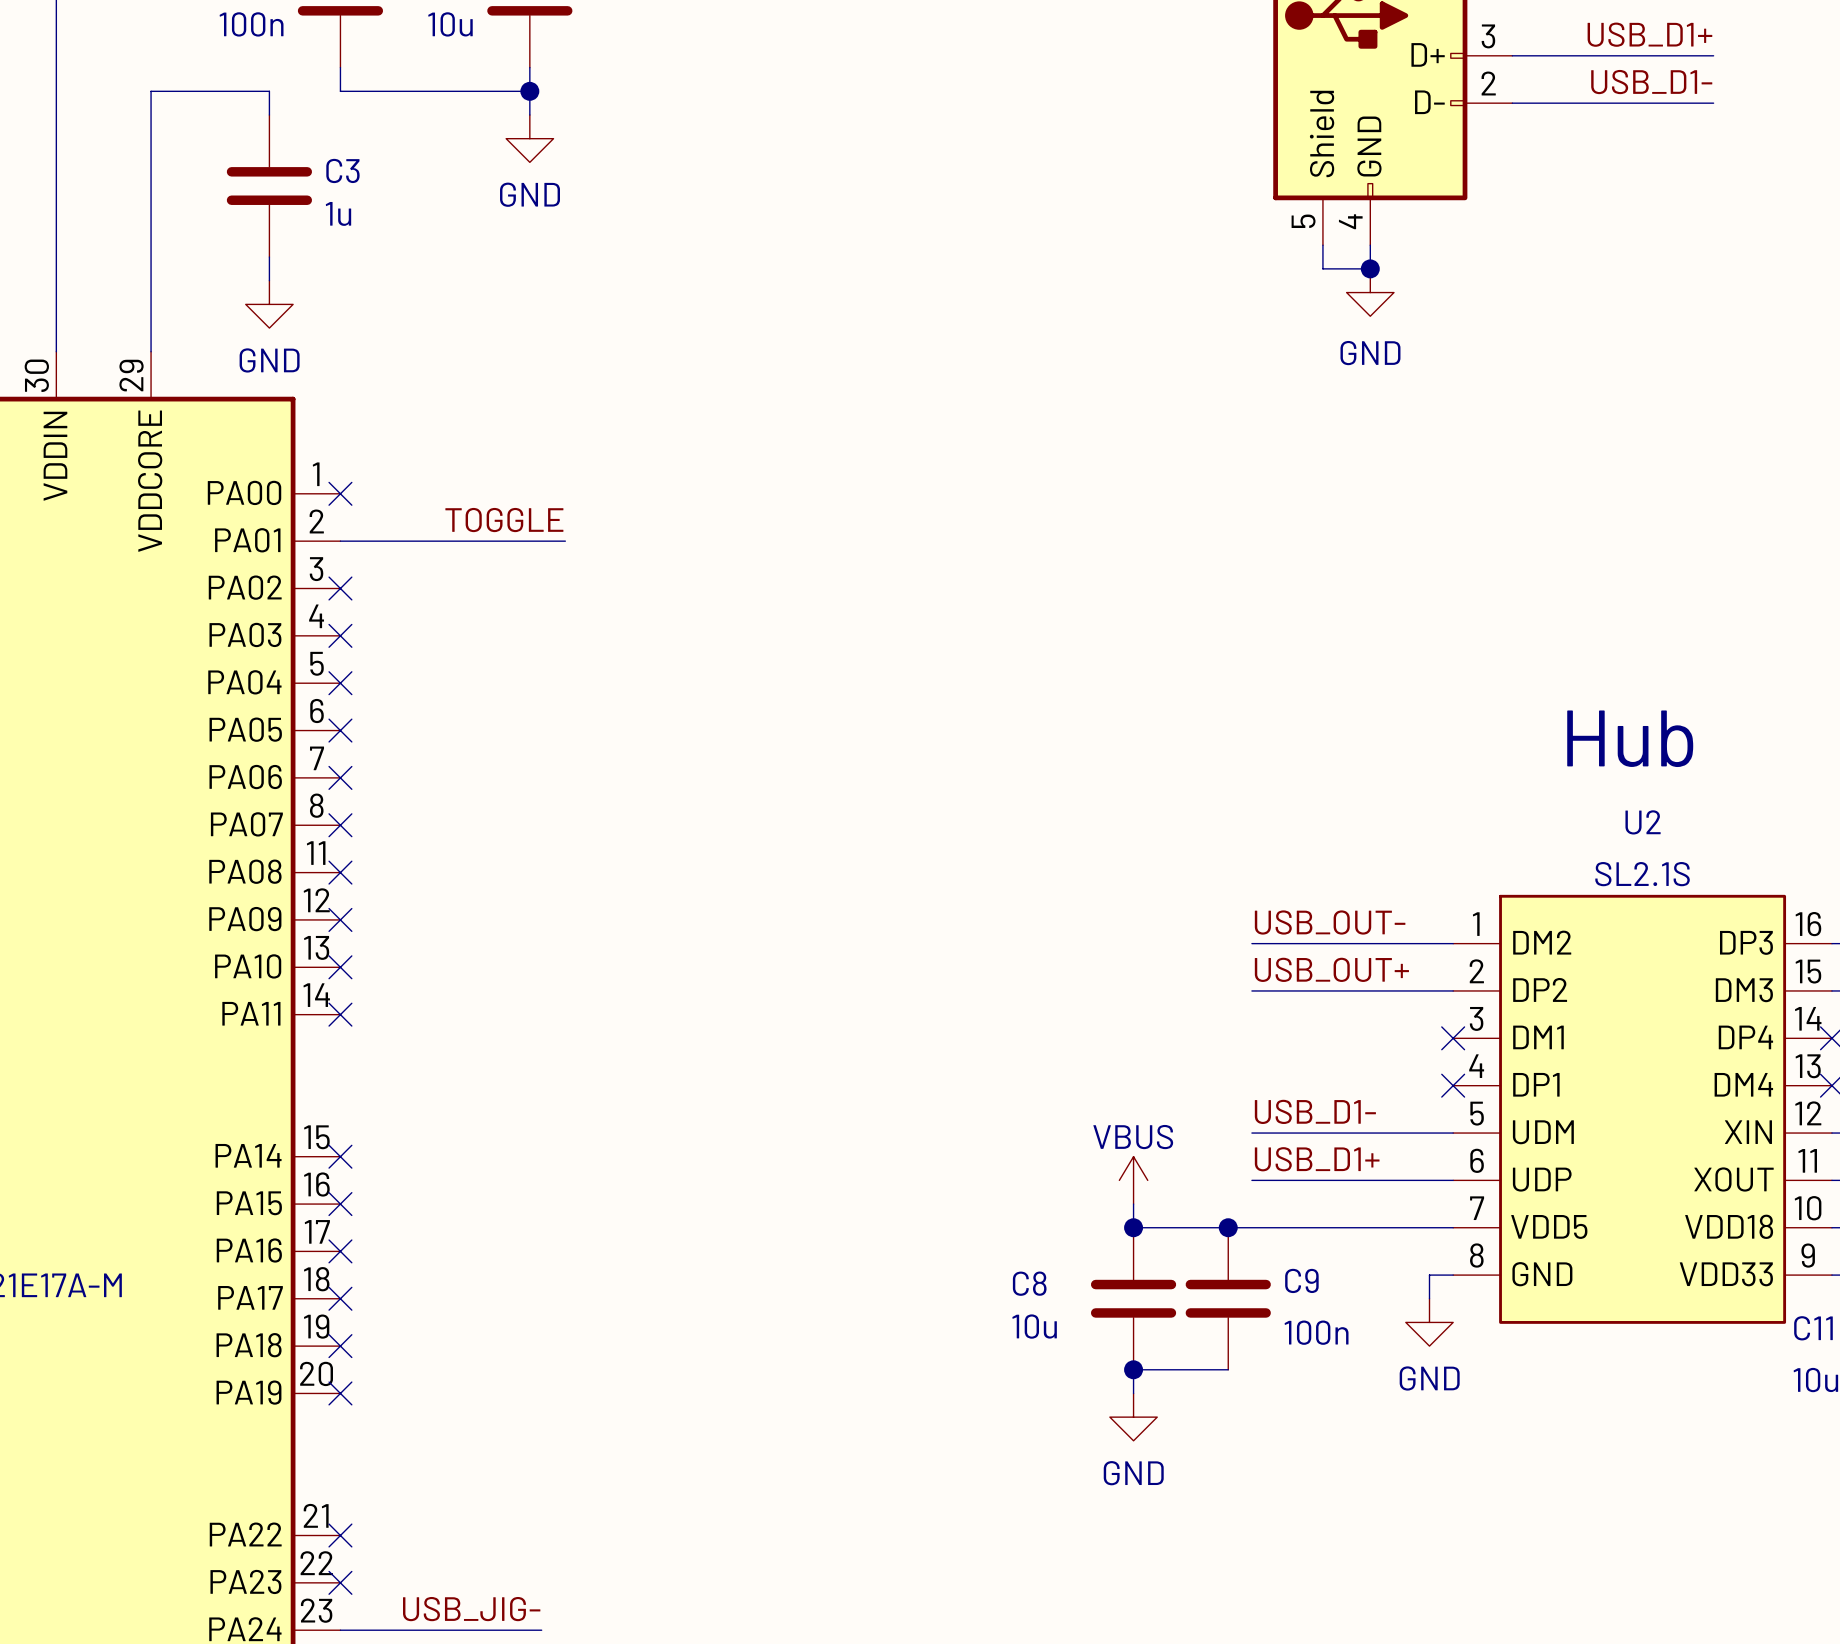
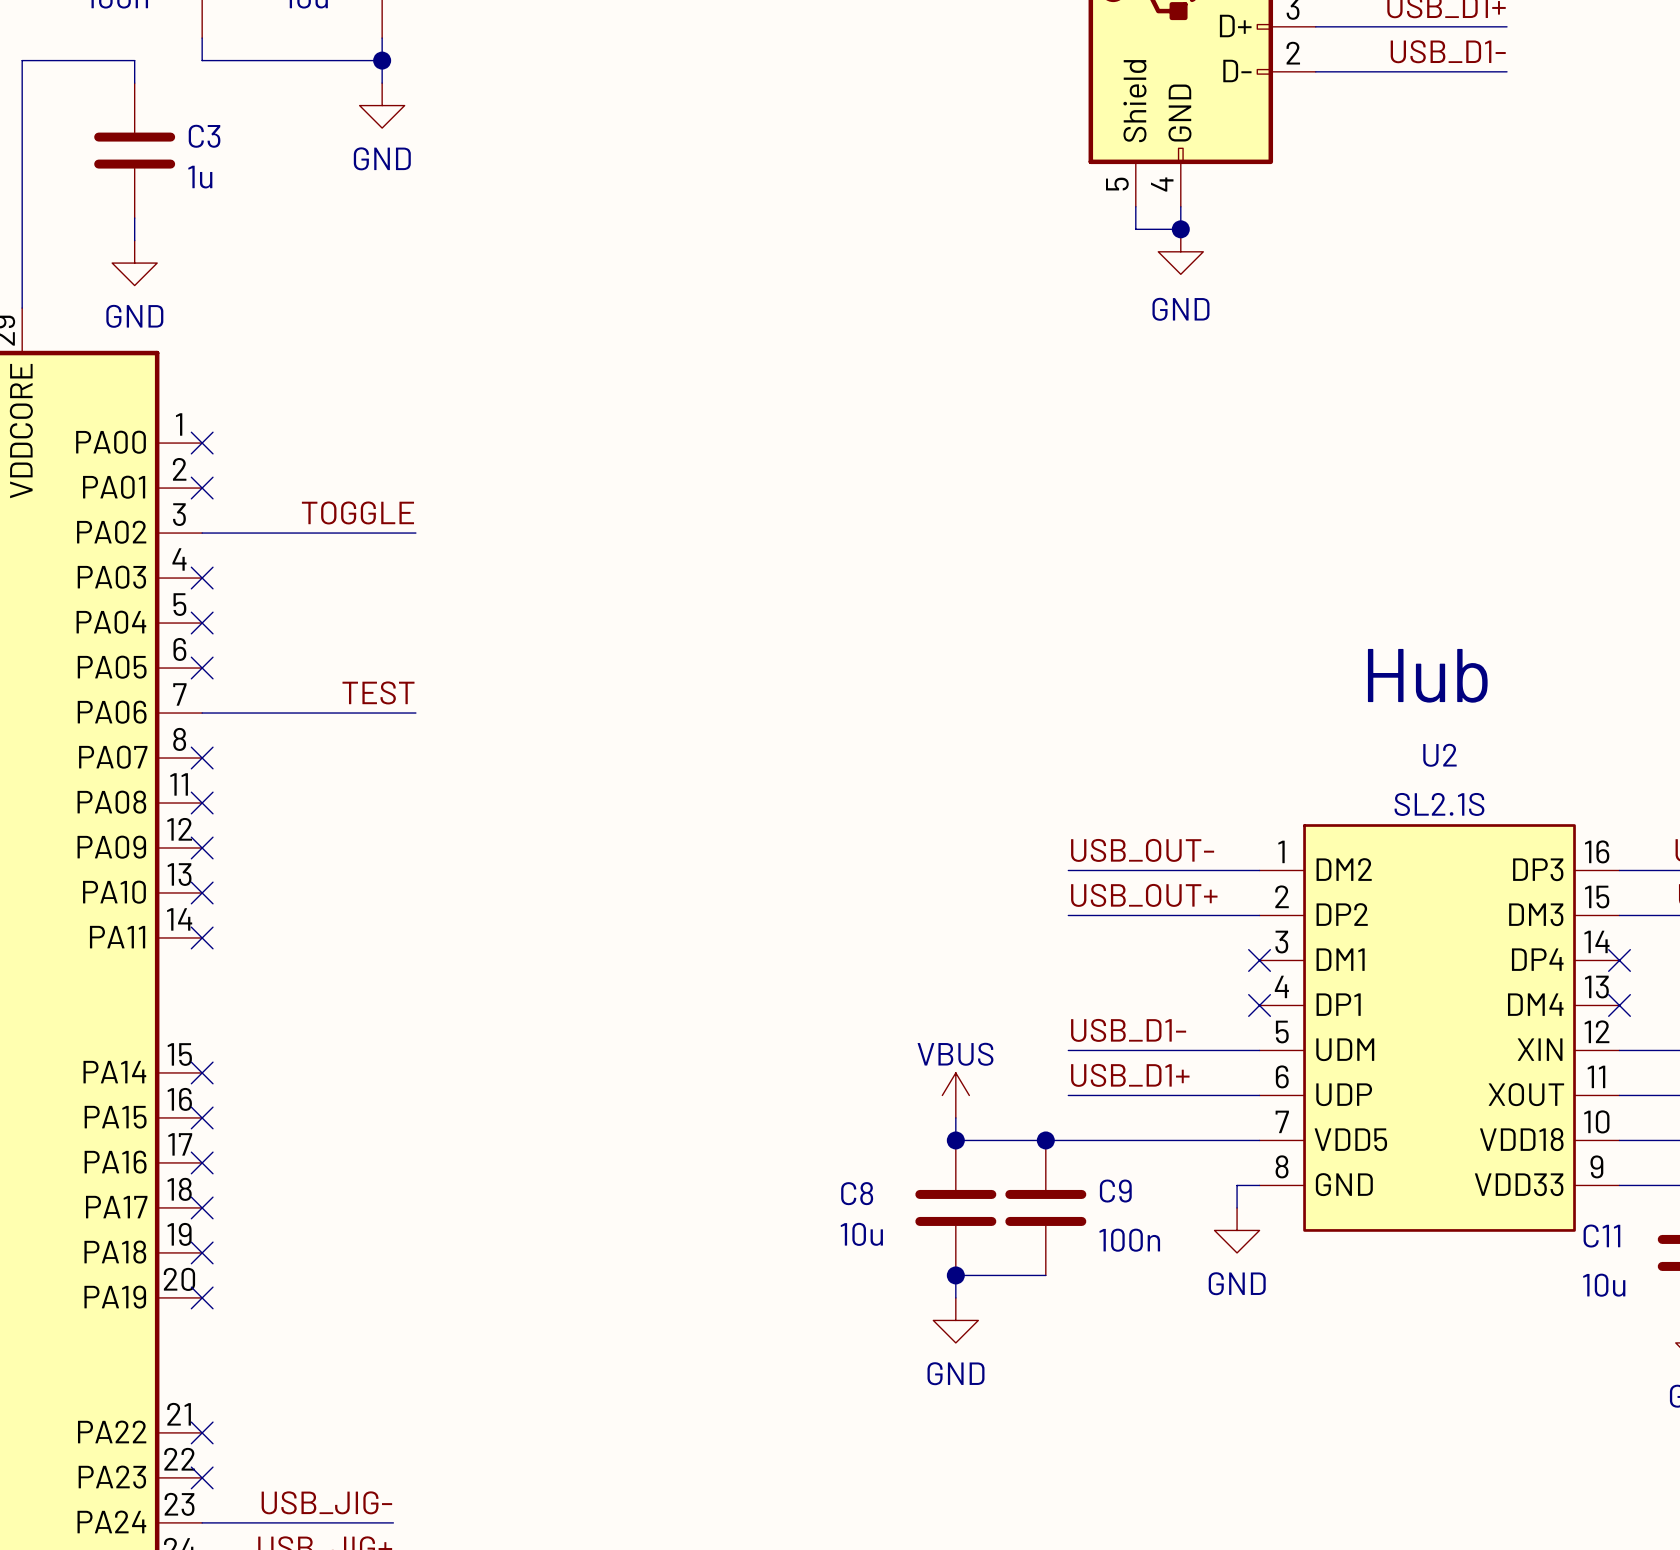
label position: TOGGLE (504, 520) -> TOGGLE (357, 512)
wire: (340, 541) (565, 541) -> (202, 533) (415, 533)
no-connect mark position: (340, 588) -> (202, 488)
label: none -> TEST (378, 692)
wire: none -> (202, 713) (415, 713)
no-connect mark: (340, 777) -> none

